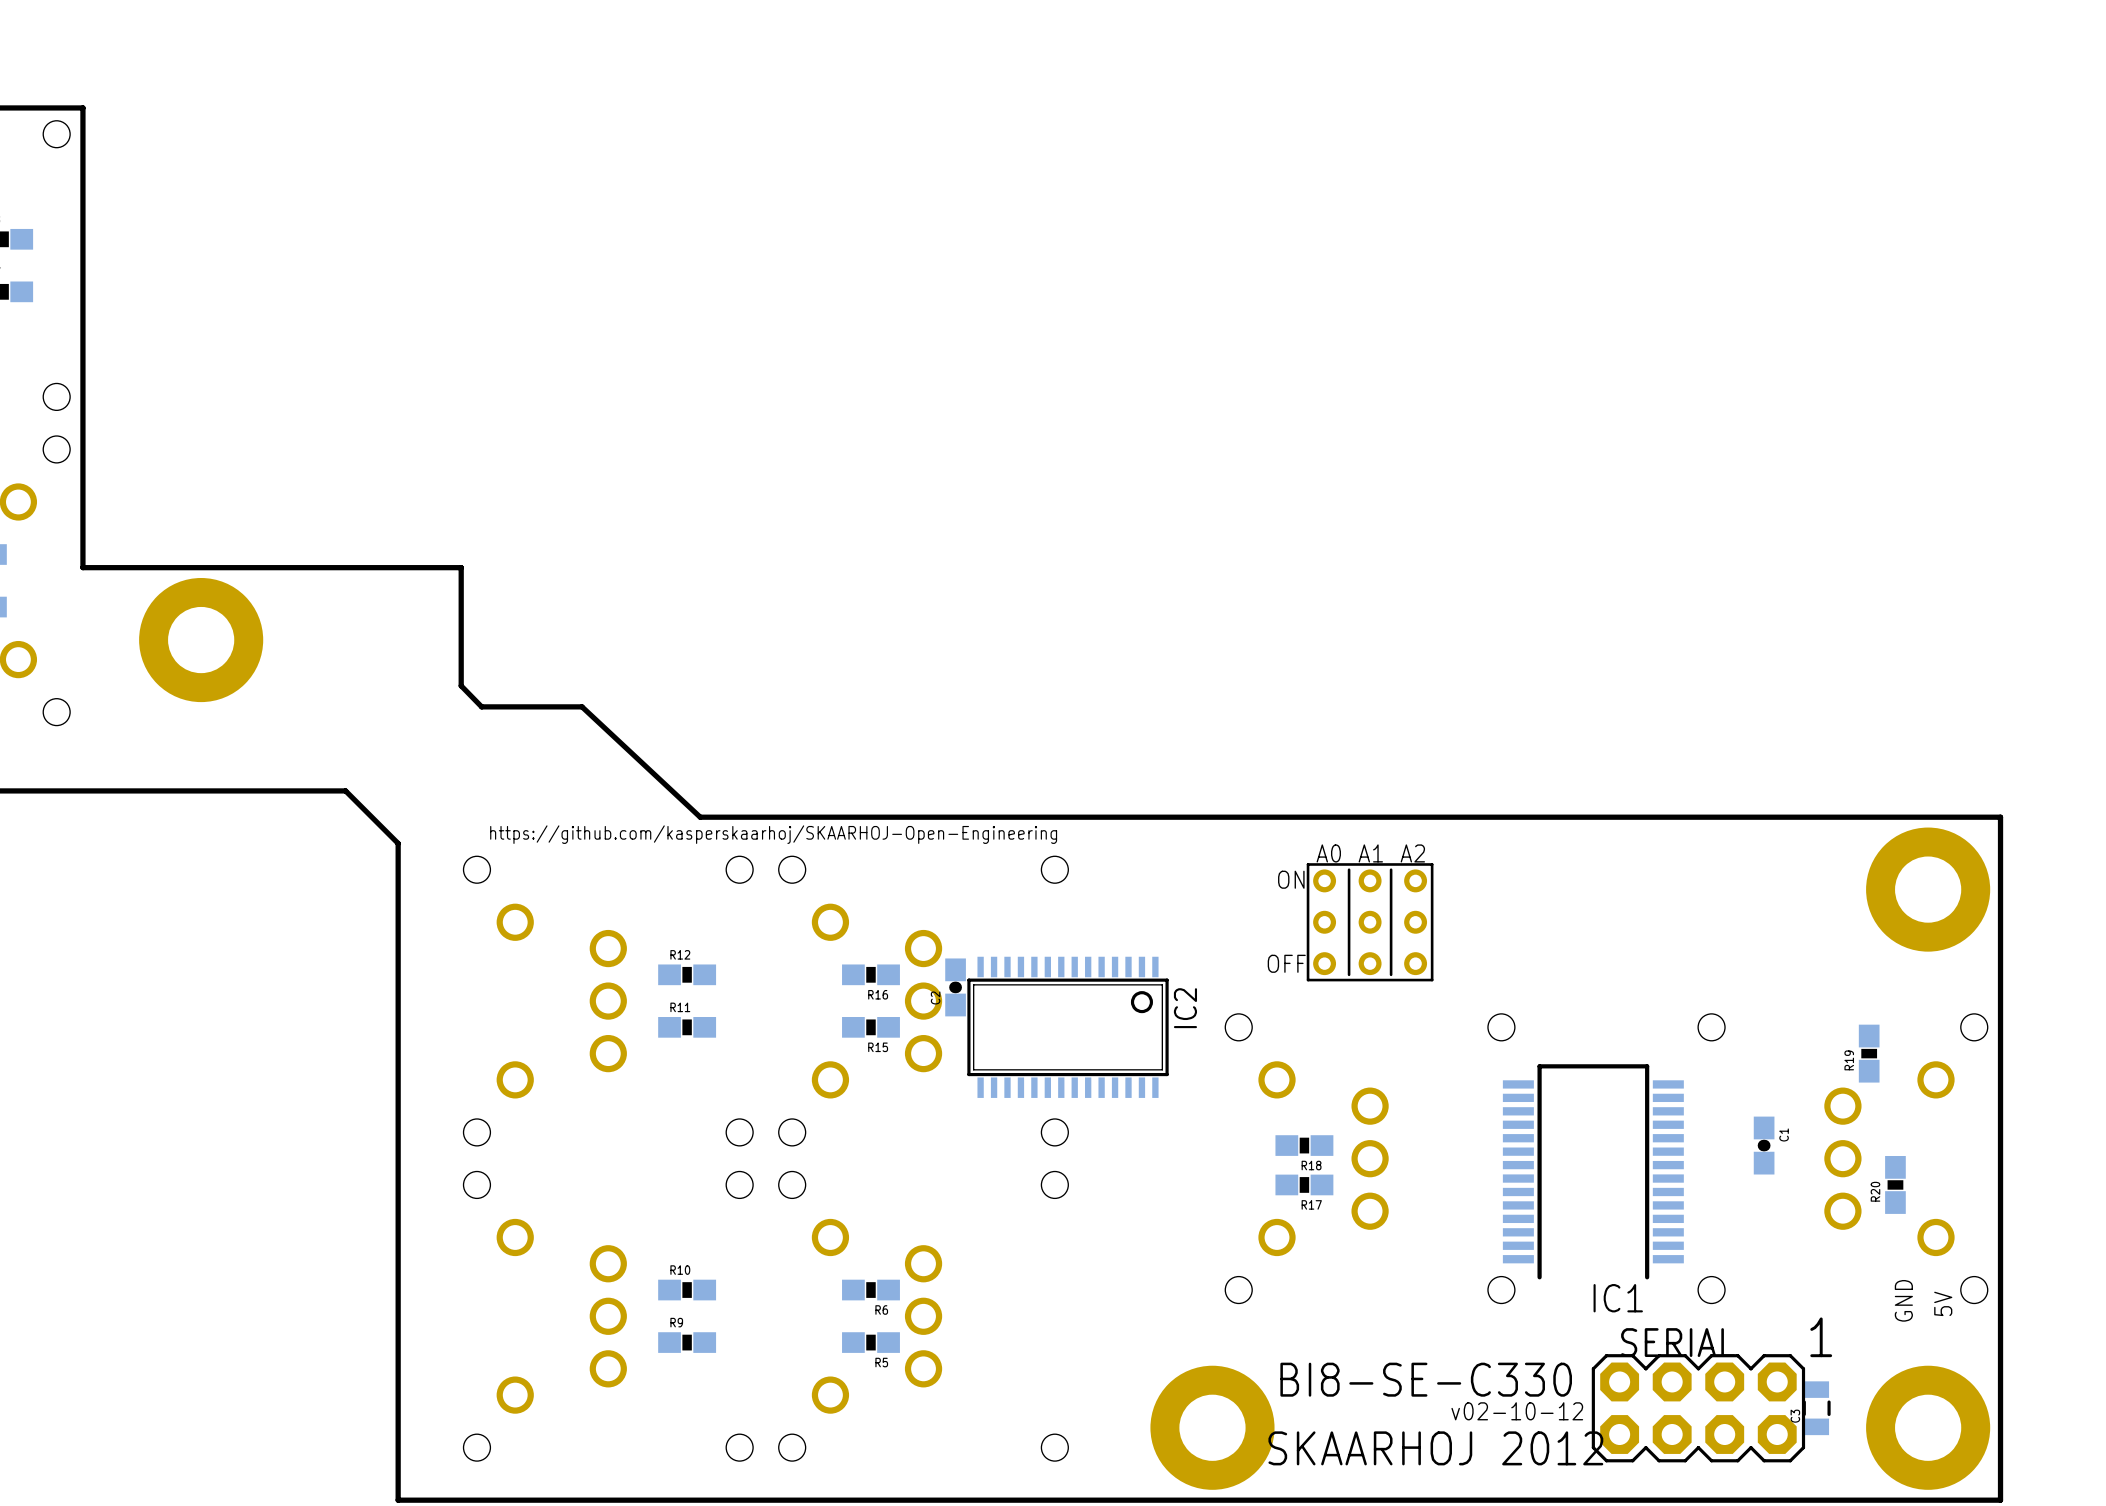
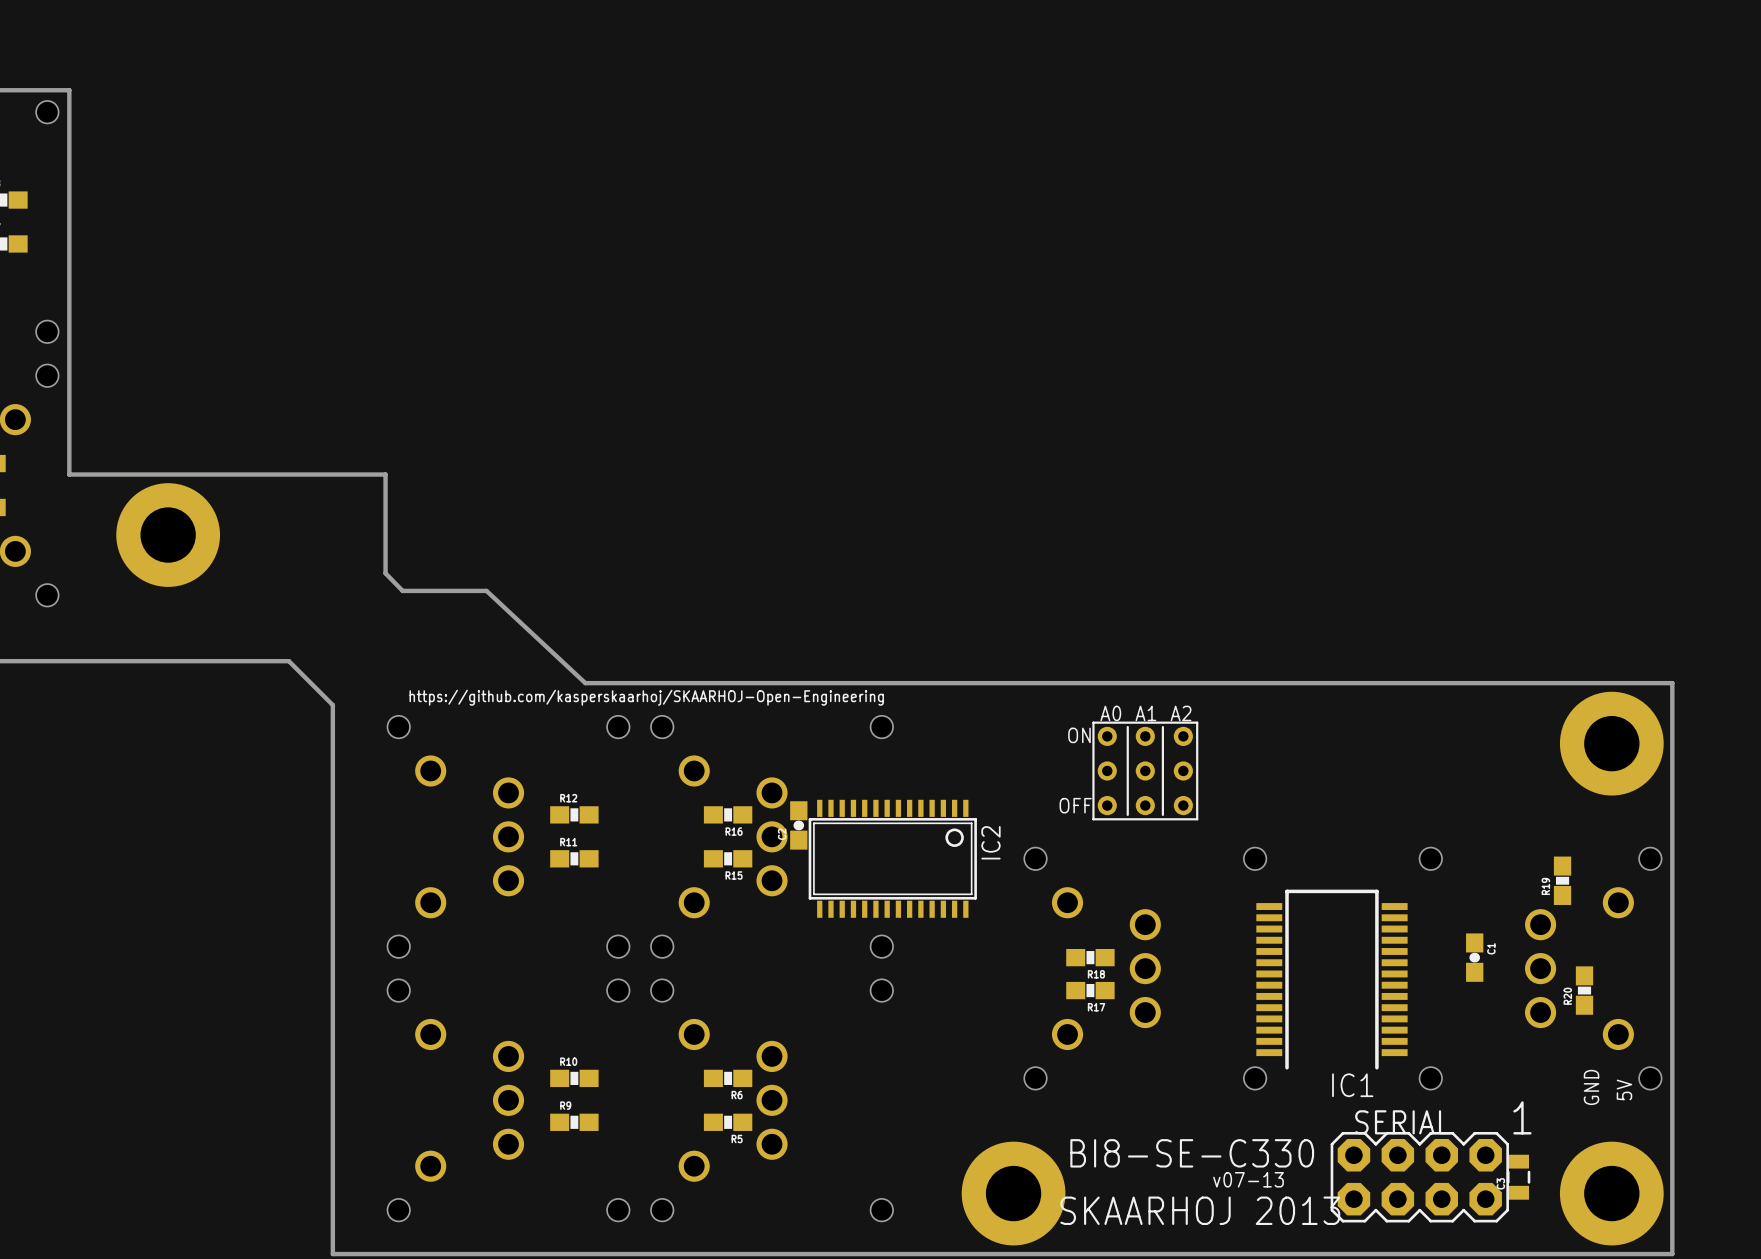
text: v02-10-12 (1517, 1411) -> v07-13 (1248, 1179)
text: SKAARHOJ 2012 (1435, 1448) -> SKAARHOJ 2013 (1200, 1210)

